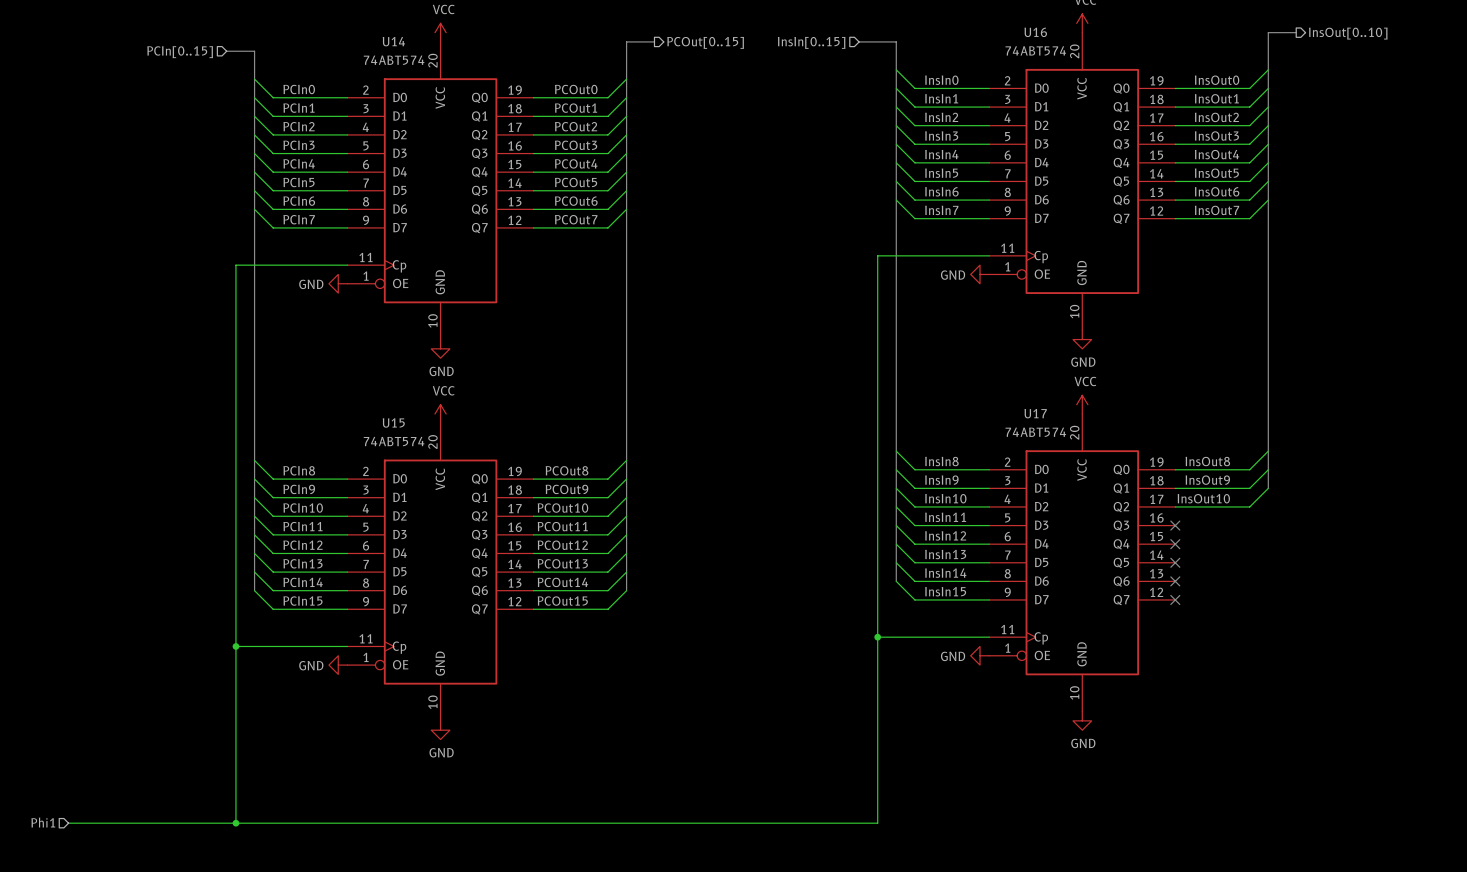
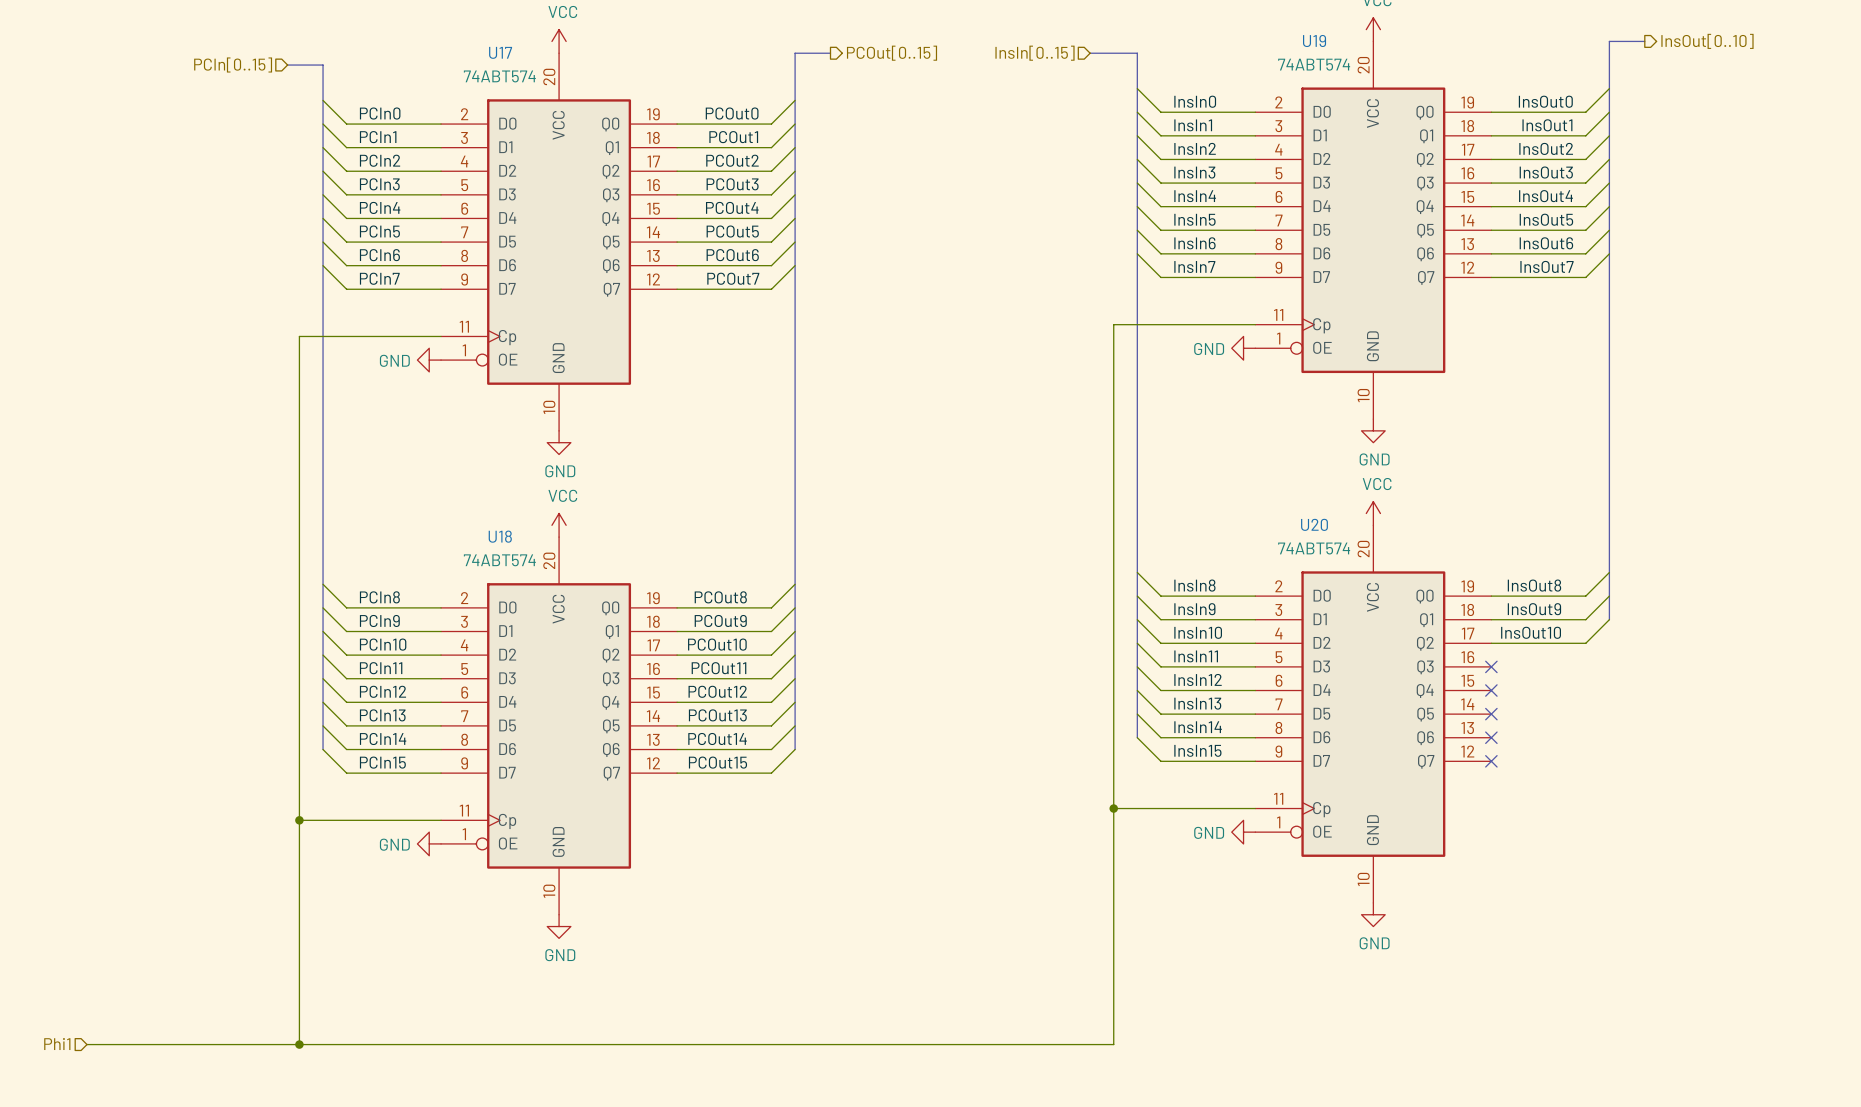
U16 name: U16 (1035, 32) -> U19 (1314, 40)
U14 name: U14 (393, 41) -> U17 (500, 52)
U17 name: U17 (1035, 413) -> U20 (1314, 524)
U15 name: U15 (393, 422) -> U18 (500, 536)

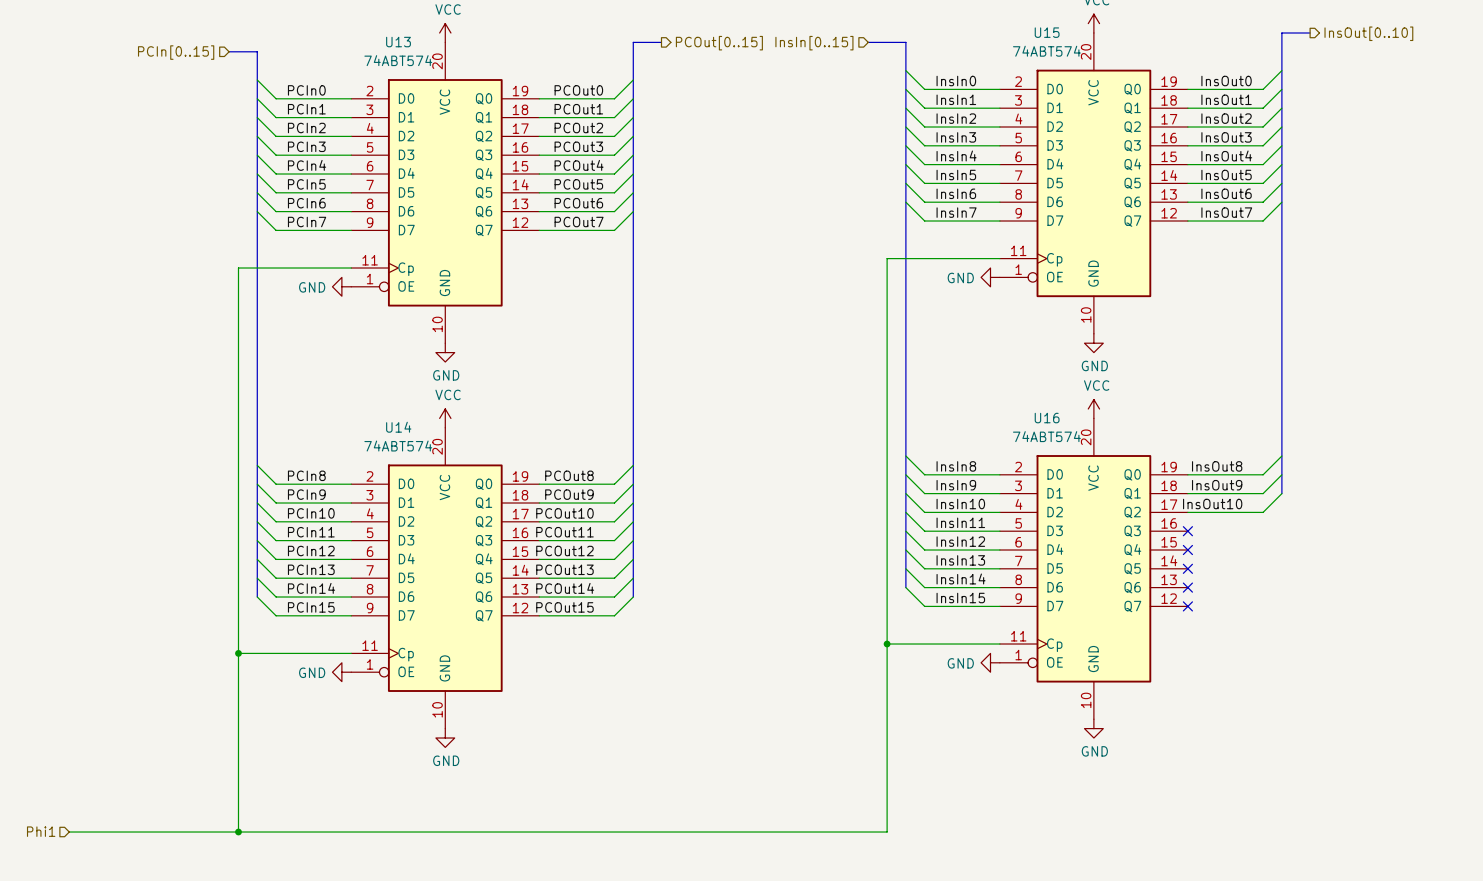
U19 name: U19 (1314, 40) -> U15 (1047, 32)
U17 name: U17 (500, 52) -> U13 (398, 42)
U20 name: U20 (1314, 524) -> U16 (1047, 418)
U18 name: U18 (500, 536) -> U14 (398, 427)

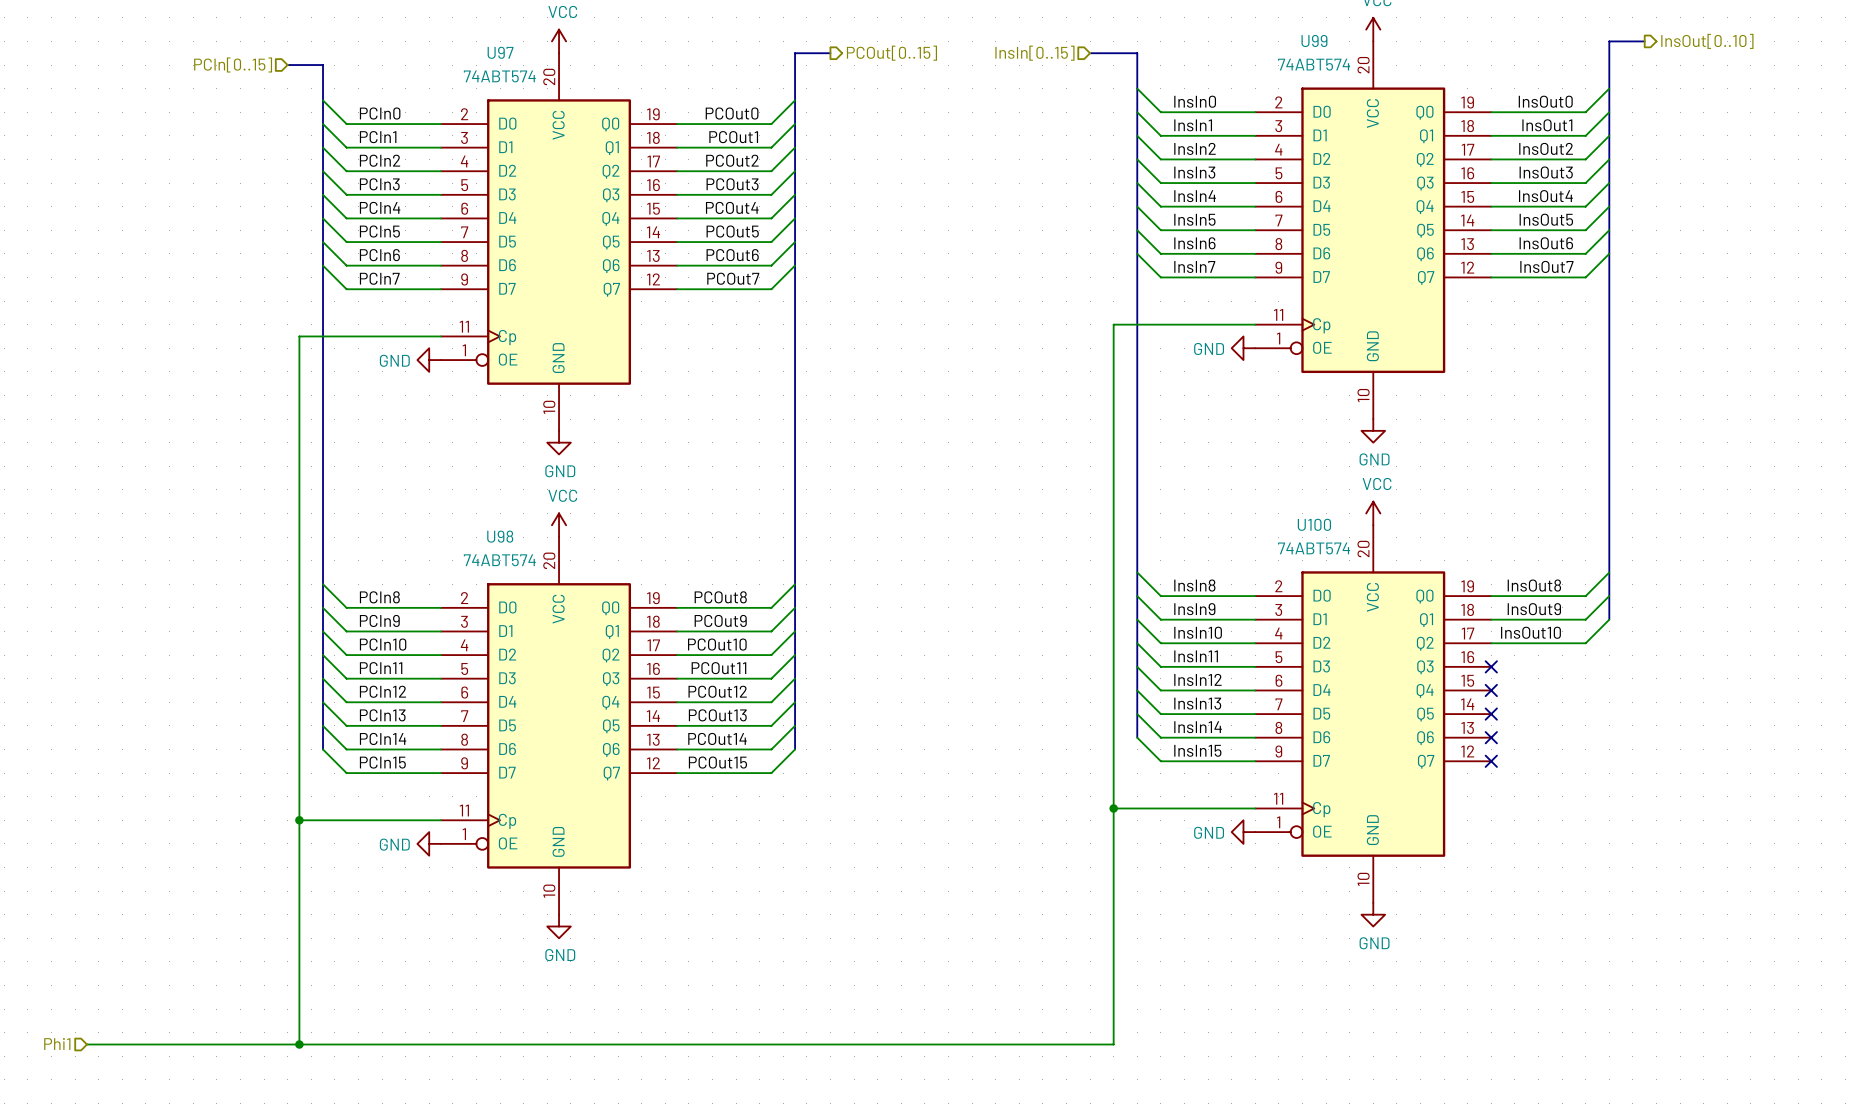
U15 name: U15 (1047, 32) -> U99 (1314, 40)
U13 name: U13 (398, 42) -> U97 (500, 52)
U16 name: U16 (1047, 418) -> U100 (1314, 524)
U14 name: U14 (398, 427) -> U98 (500, 536)

